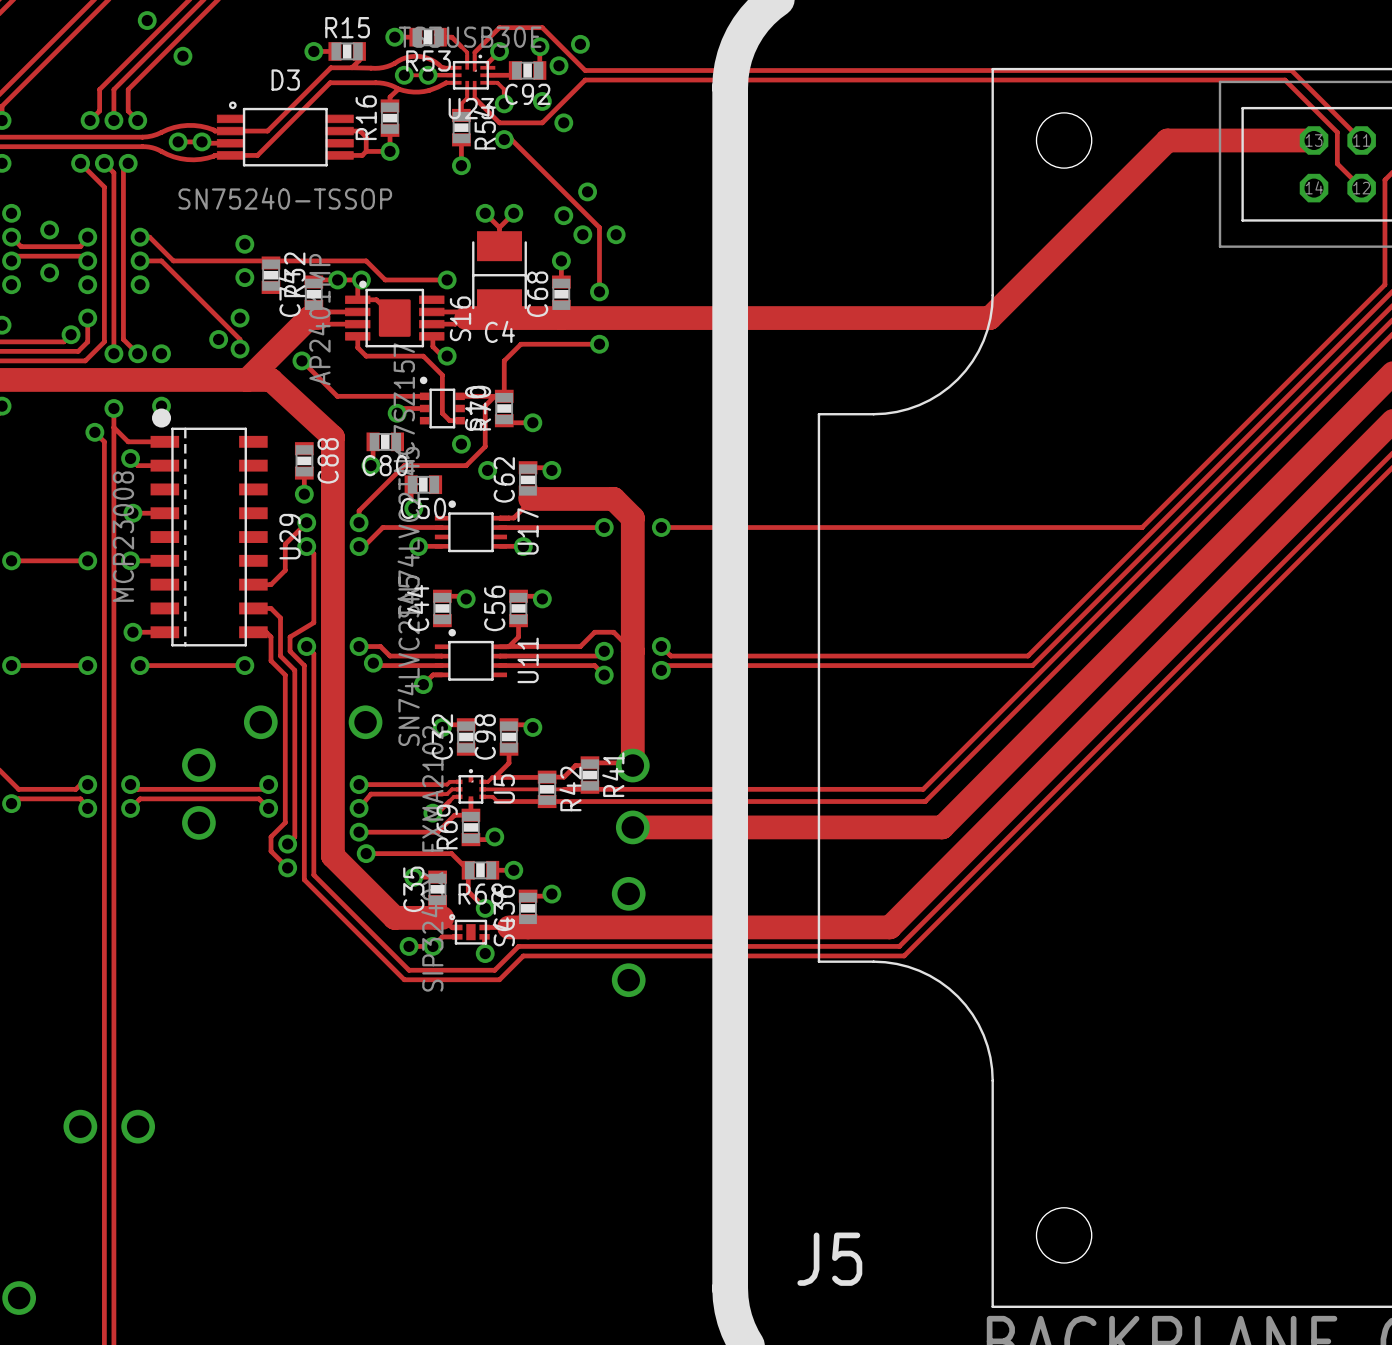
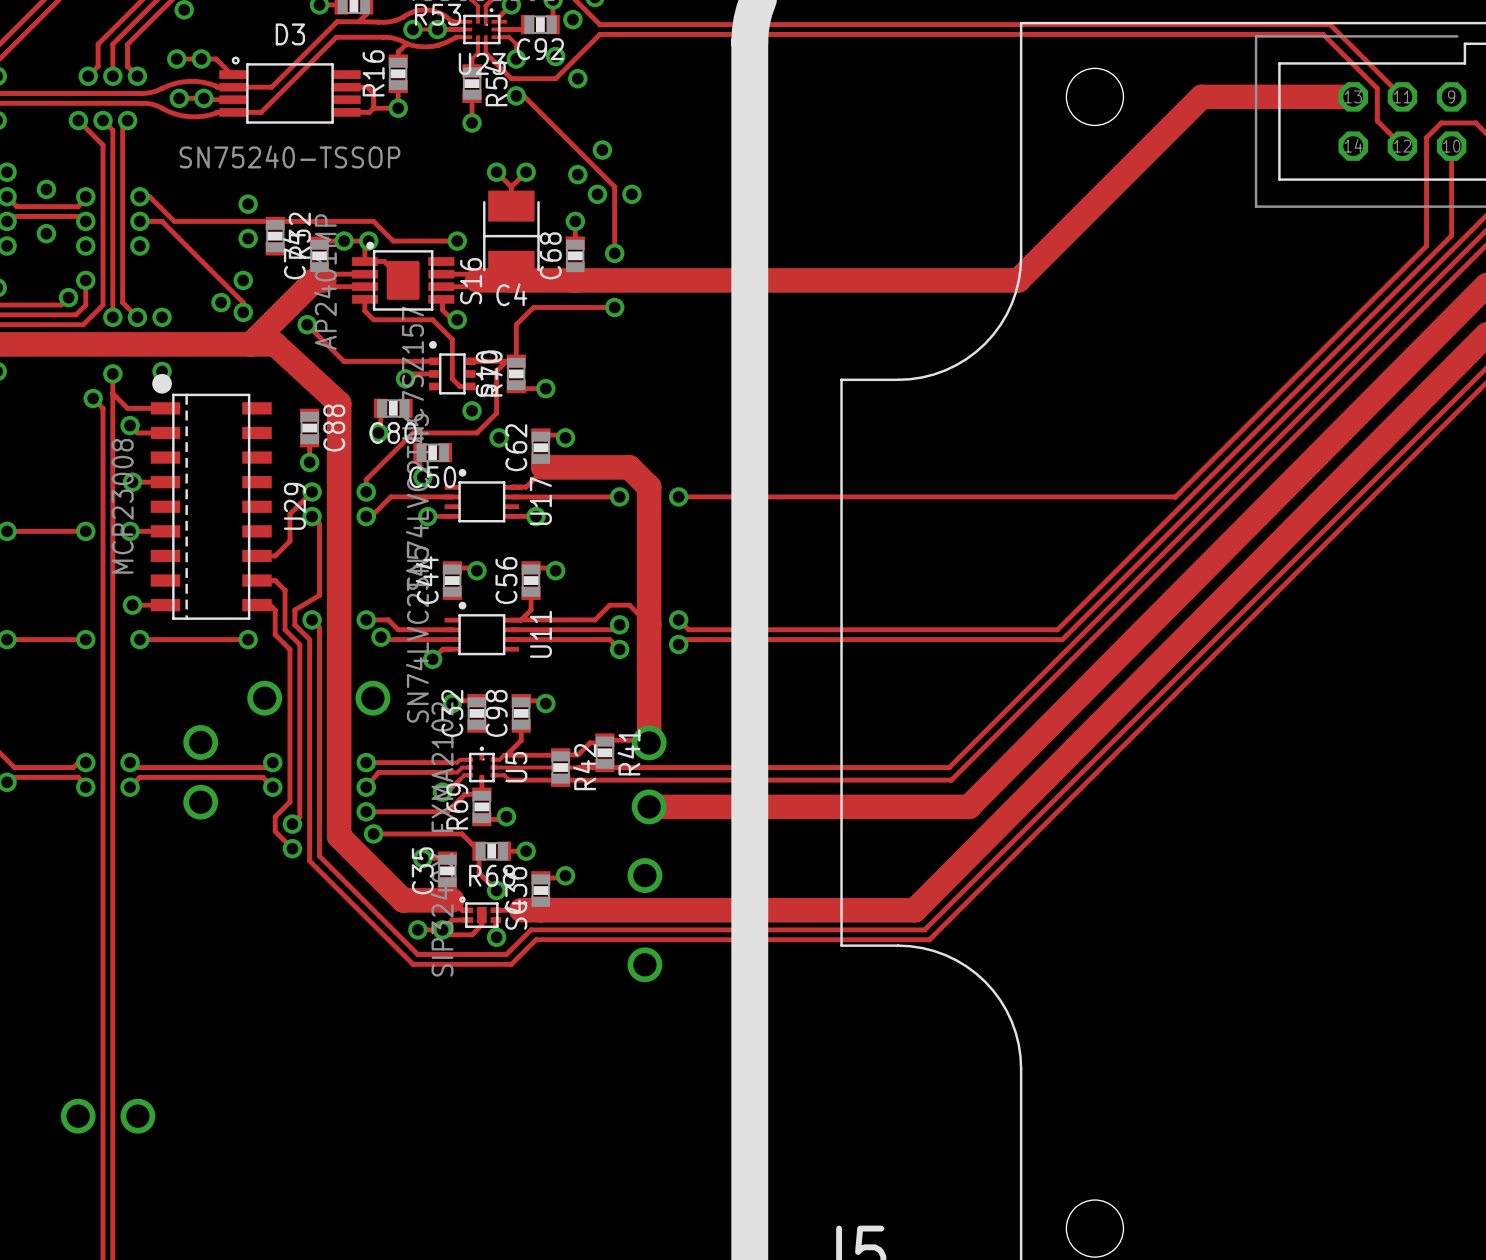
track: none -> (176, 59) (216, 59) (233, 74)
via: none -> (176, 59)
via: none -> (201, 59)
track: none -> (481, 915) (481, 924) (472, 934) (447, 934) (442, 929)

